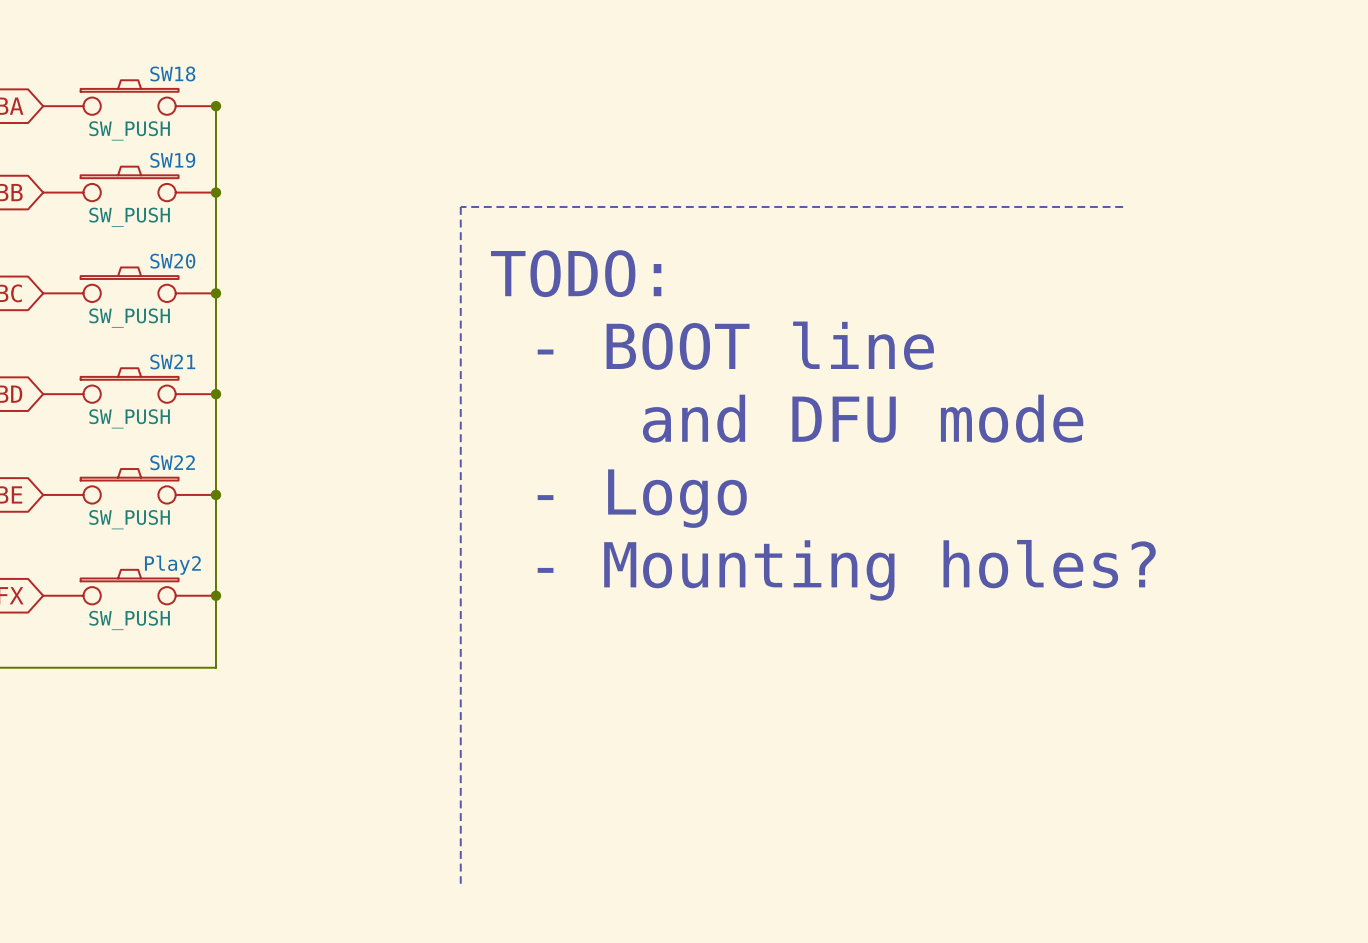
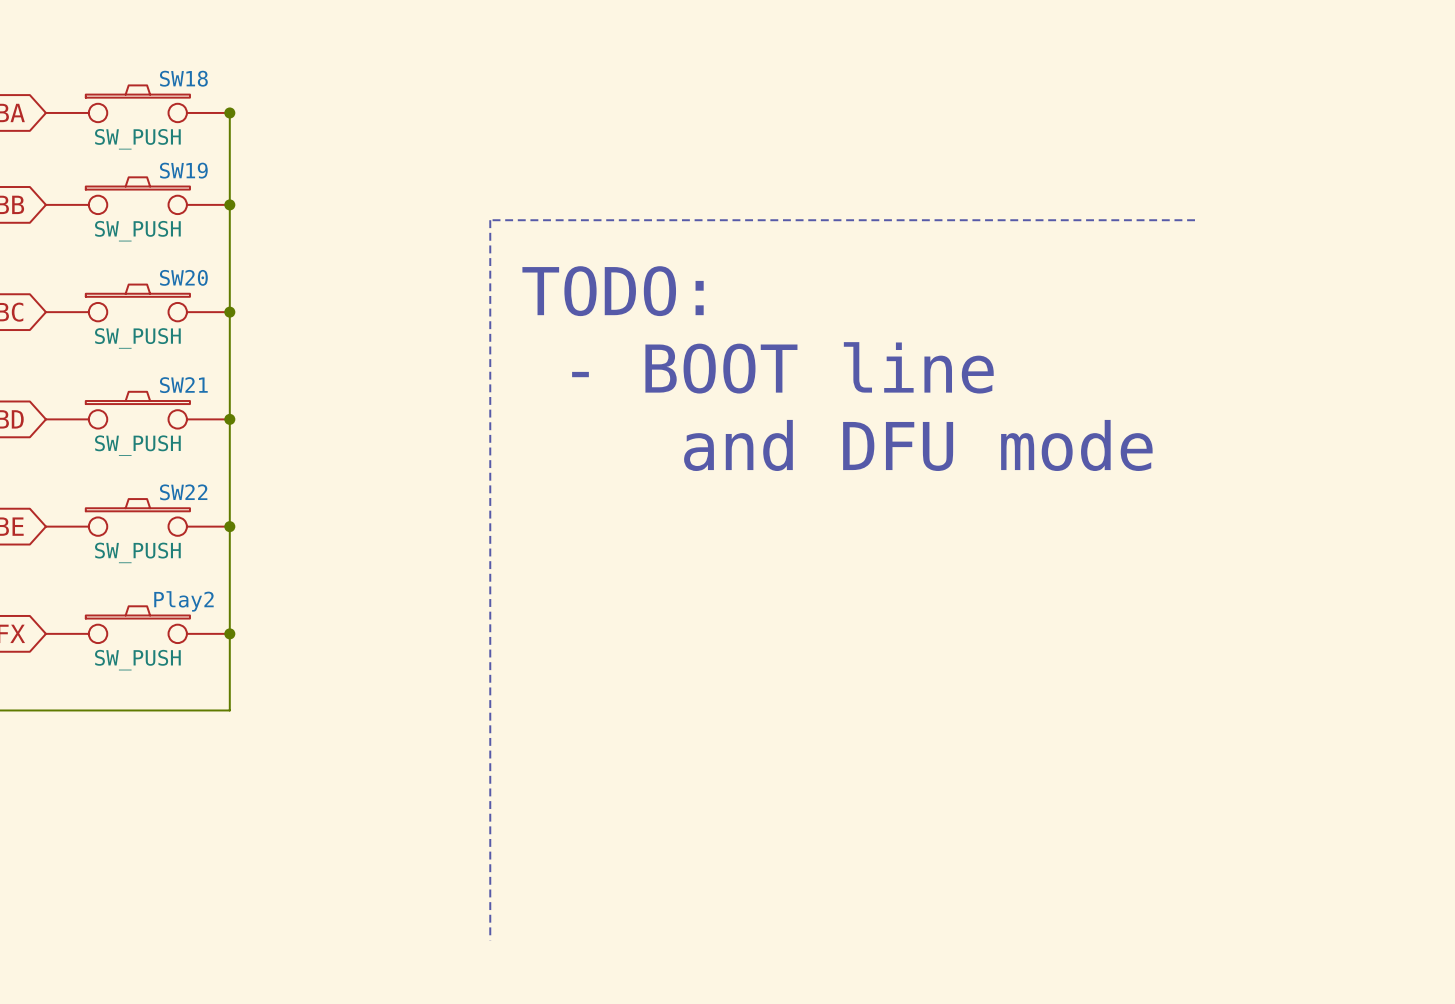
text: - Logo (642, 498) -> none
text: - Mounting holes? (846, 570) -> none

